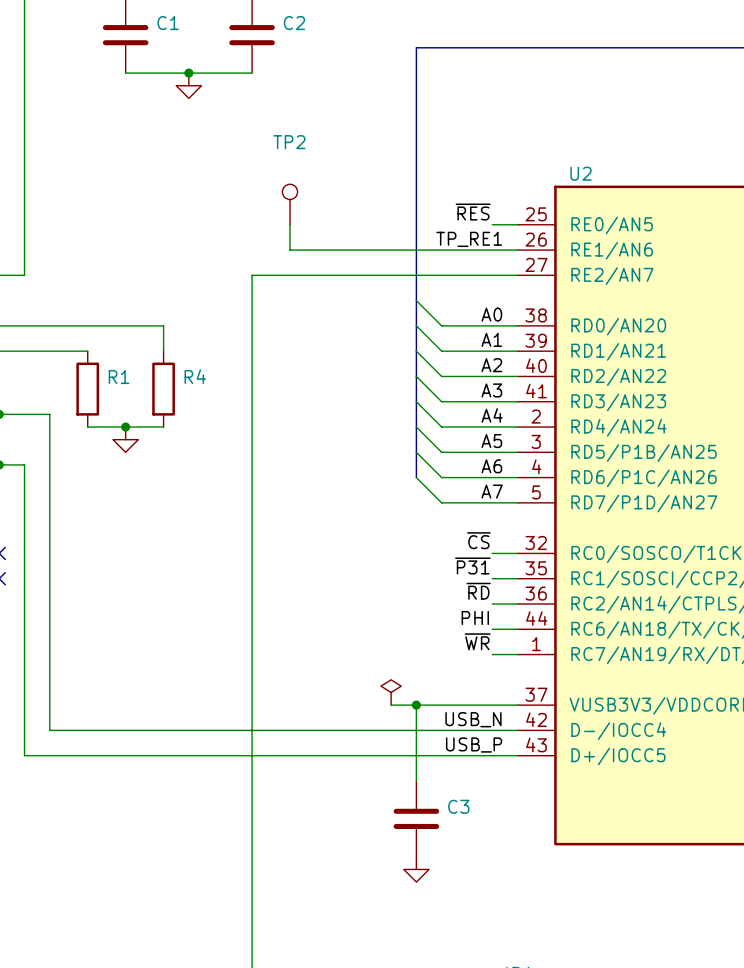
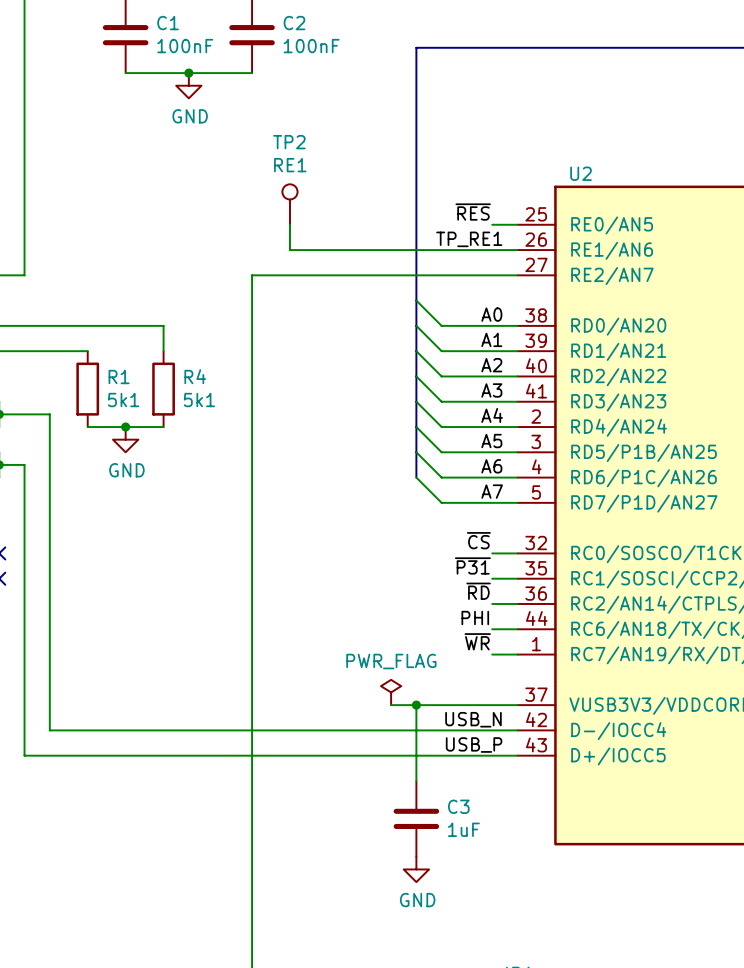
C1 value: none -> 100nF (185, 46)
C2 value: none -> 100nF (311, 46)
power symbol text: none -> GND (190, 116)
TP2 value: none -> RE1 (290, 165)
R1 value: none -> 5k1 (123, 400)
R4 value: none -> 5k1 (199, 400)
power symbol text: none -> GND (126, 470)
power symbol text: none -> PWR_FLAG (391, 661)
C3 value: none -> 1uF (463, 829)
power symbol text: none -> GND (417, 900)

